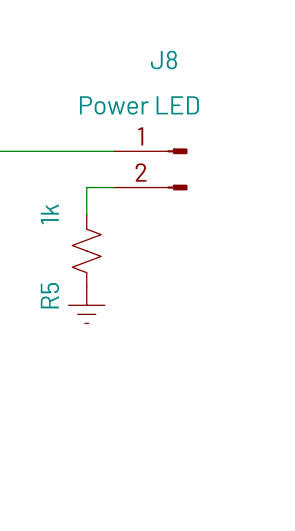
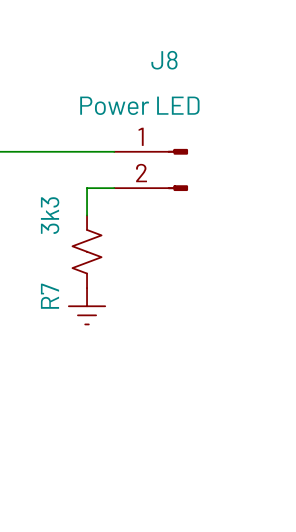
R5 value: 1k (49, 214) -> 3k3 (50, 215)
R5 name: R5 (49, 295) -> R7 (50, 296)

